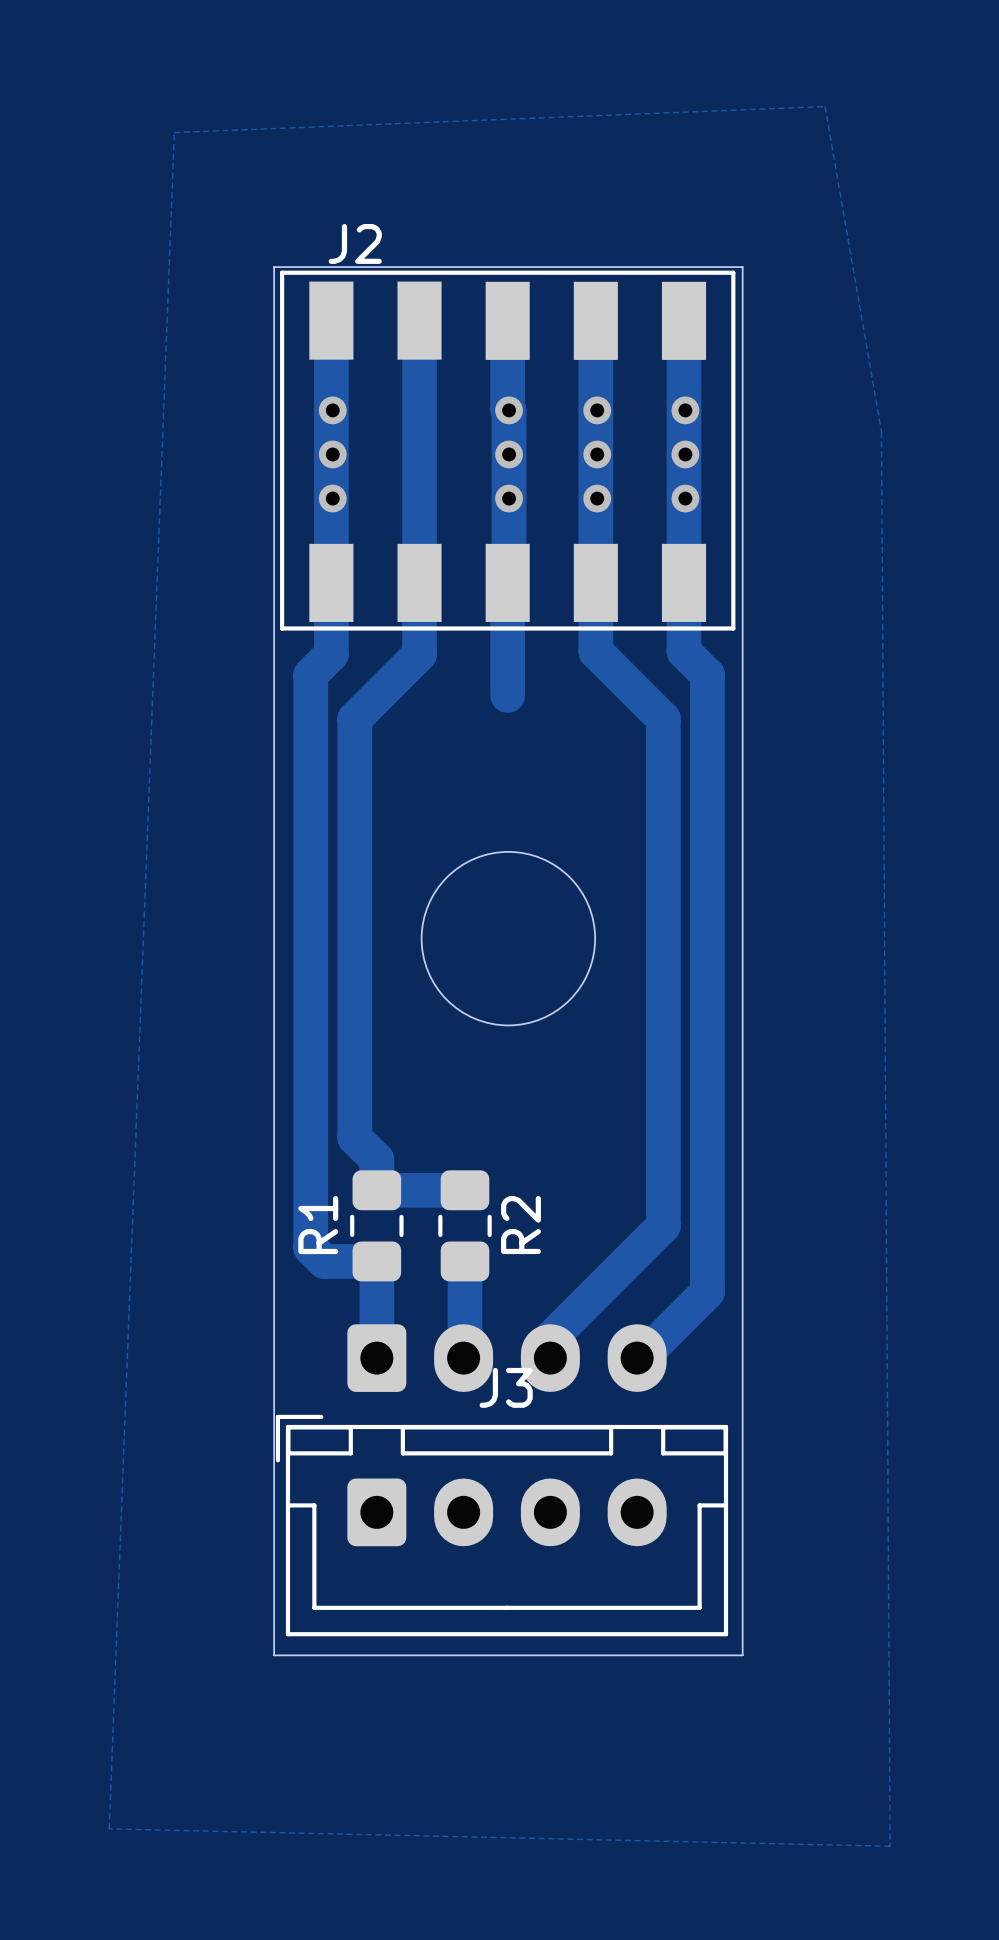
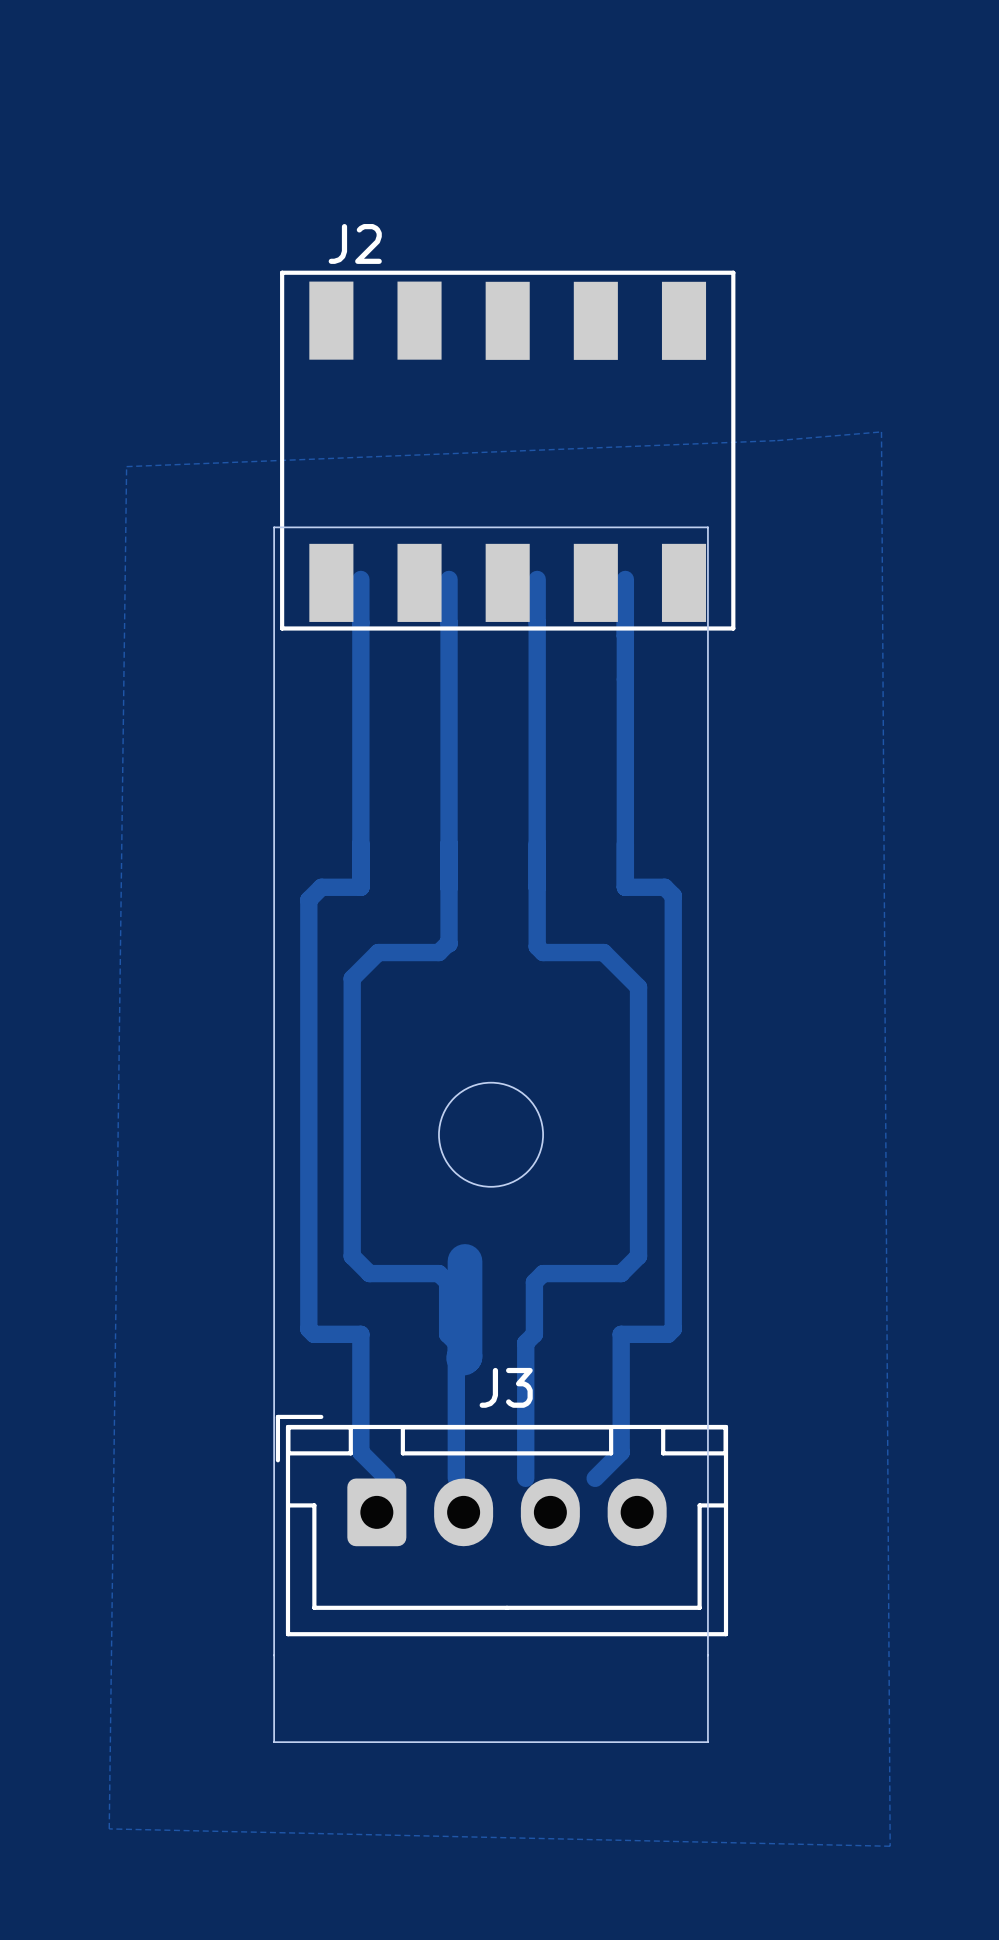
track: (331, 320) (331, 654) (310, 674) (310, 1247) (324, 1261) (376, 1261) (376, 1358) -> none
track: (419, 320) (419, 654) (354, 718) (354, 1137) (376, 1159) (376, 1190) (465, 1190) -> none
track: (507, 320) (507, 695) -> none
track: (595, 320) (595, 651) (663, 718) (663, 1225) (550, 1338) (550, 1358) -> none
track: (684, 320) (684, 651) (707, 674) (707, 1291) (641, 1358) (637, 1358) -> none
via: (332, 410) -> none
via: (509, 410) -> none
via: (597, 410) -> none
via: (685, 410) -> none
zone outline: (881, 431) (825, 106) (174, 132) (109, 1828) -> (881, 431) (777, 440) (126, 466) (109, 1828)
via: (332, 454) -> none
via: (509, 454) -> none
via: (597, 454) -> none
via: (685, 454) -> none
via: (332, 498) -> none
via: (509, 498) -> none
via: (597, 498) -> none
via: (685, 498) -> none
board edge: (274, 527) (274, 267) (742, 267) (742, 1655) (274, 1655) -> (274, 527) (707, 527) (707, 1742) (274, 1742) (274, 1655)
track: none -> (360, 579) (360, 887) (321, 887) (308, 899) (308, 1329) (314, 1334) (360, 1334) (360, 1452) (386, 1478)
track: none -> (449, 579) (449, 943) (438, 952) (378, 952) (352, 978) (352, 1256) (369, 1273) (438, 1273) (447, 1282) (447, 1334) (456, 1343) (456, 1478)
track: none -> (537, 579) (537, 946) (543, 952) (603, 952) (638, 987) (638, 1256) (621, 1273) (543, 1273) (534, 1282) (534, 1334) (525, 1343) (525, 1478)
track: none -> (625, 579) (625, 887) (664, 887) (673, 895) (673, 1329) (668, 1334) (621, 1334) (621, 1452) (595, 1478)
round board edge: [420, 851, 597, 1027] -> none
round board edge: none -> [438, 1081, 544, 1188]
R1: (376, 1225) -> none
R2: (465, 1225) -> none
part: (506, 1358) -> none

